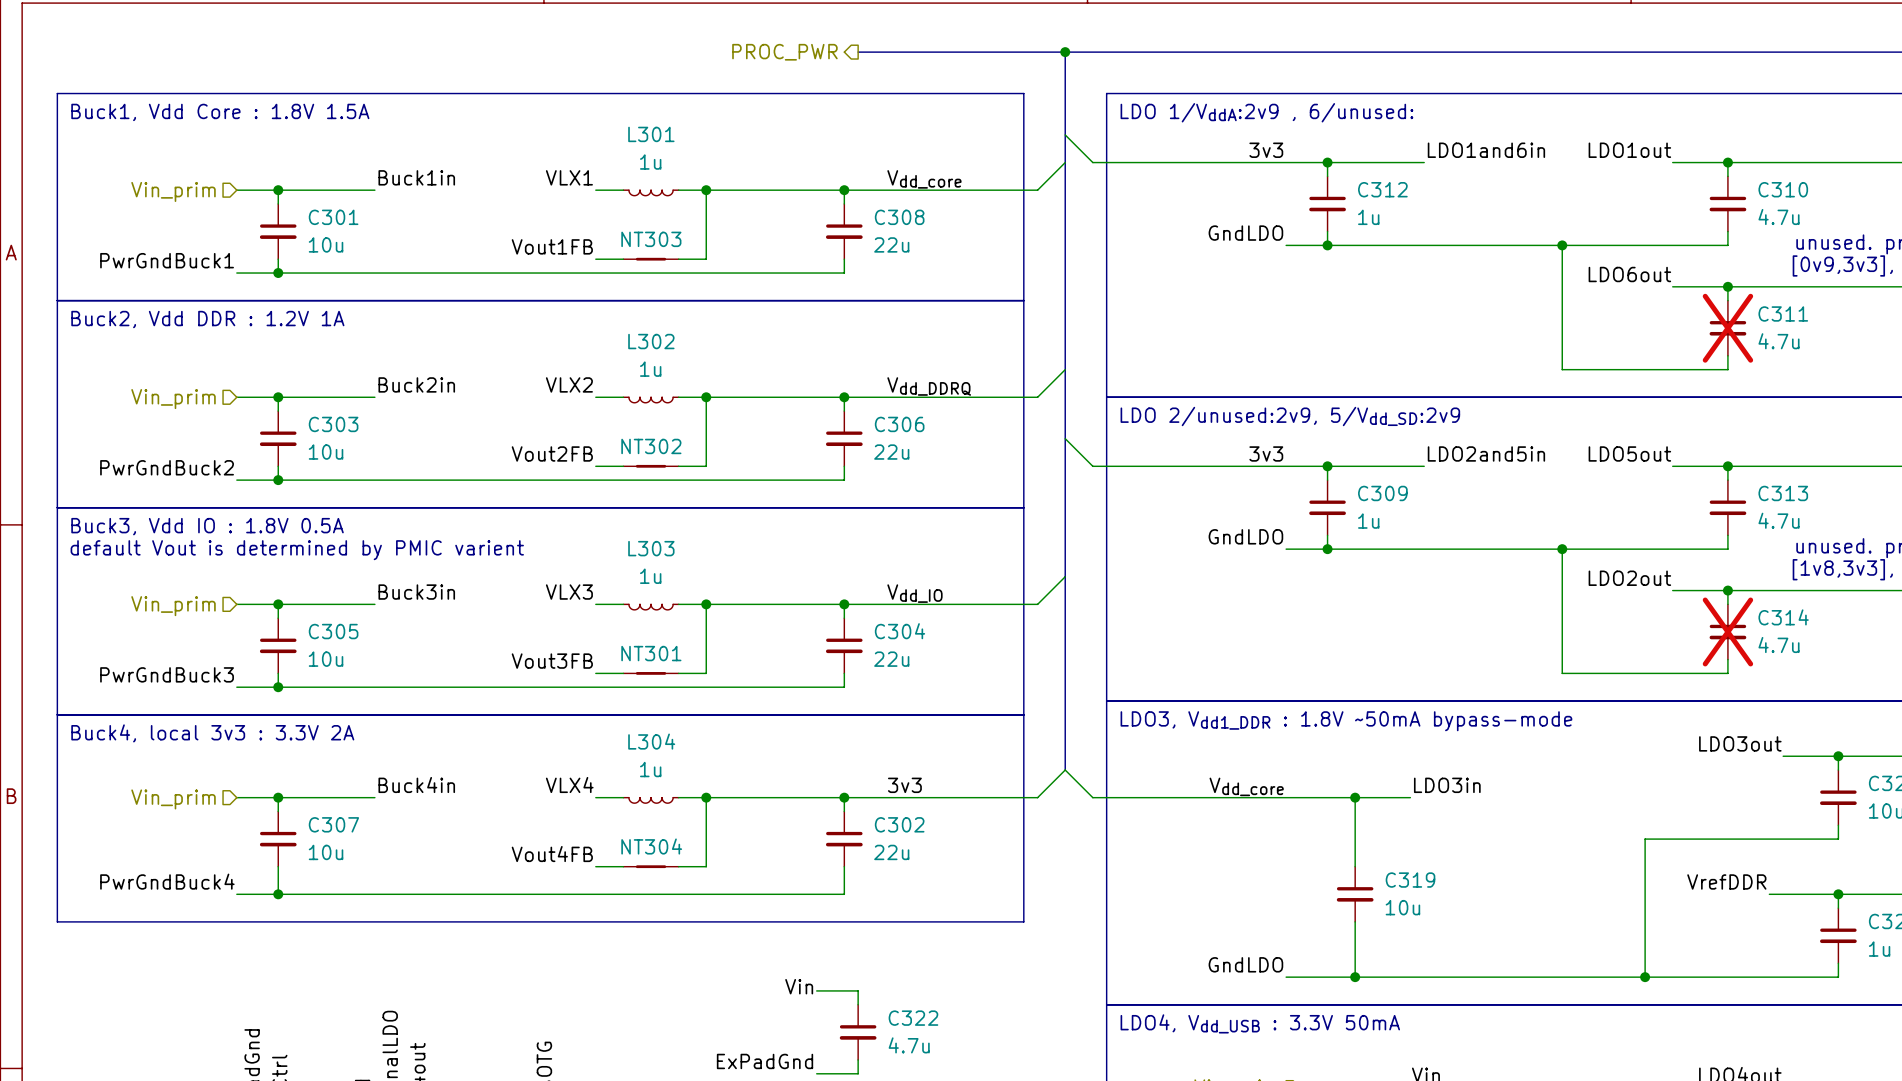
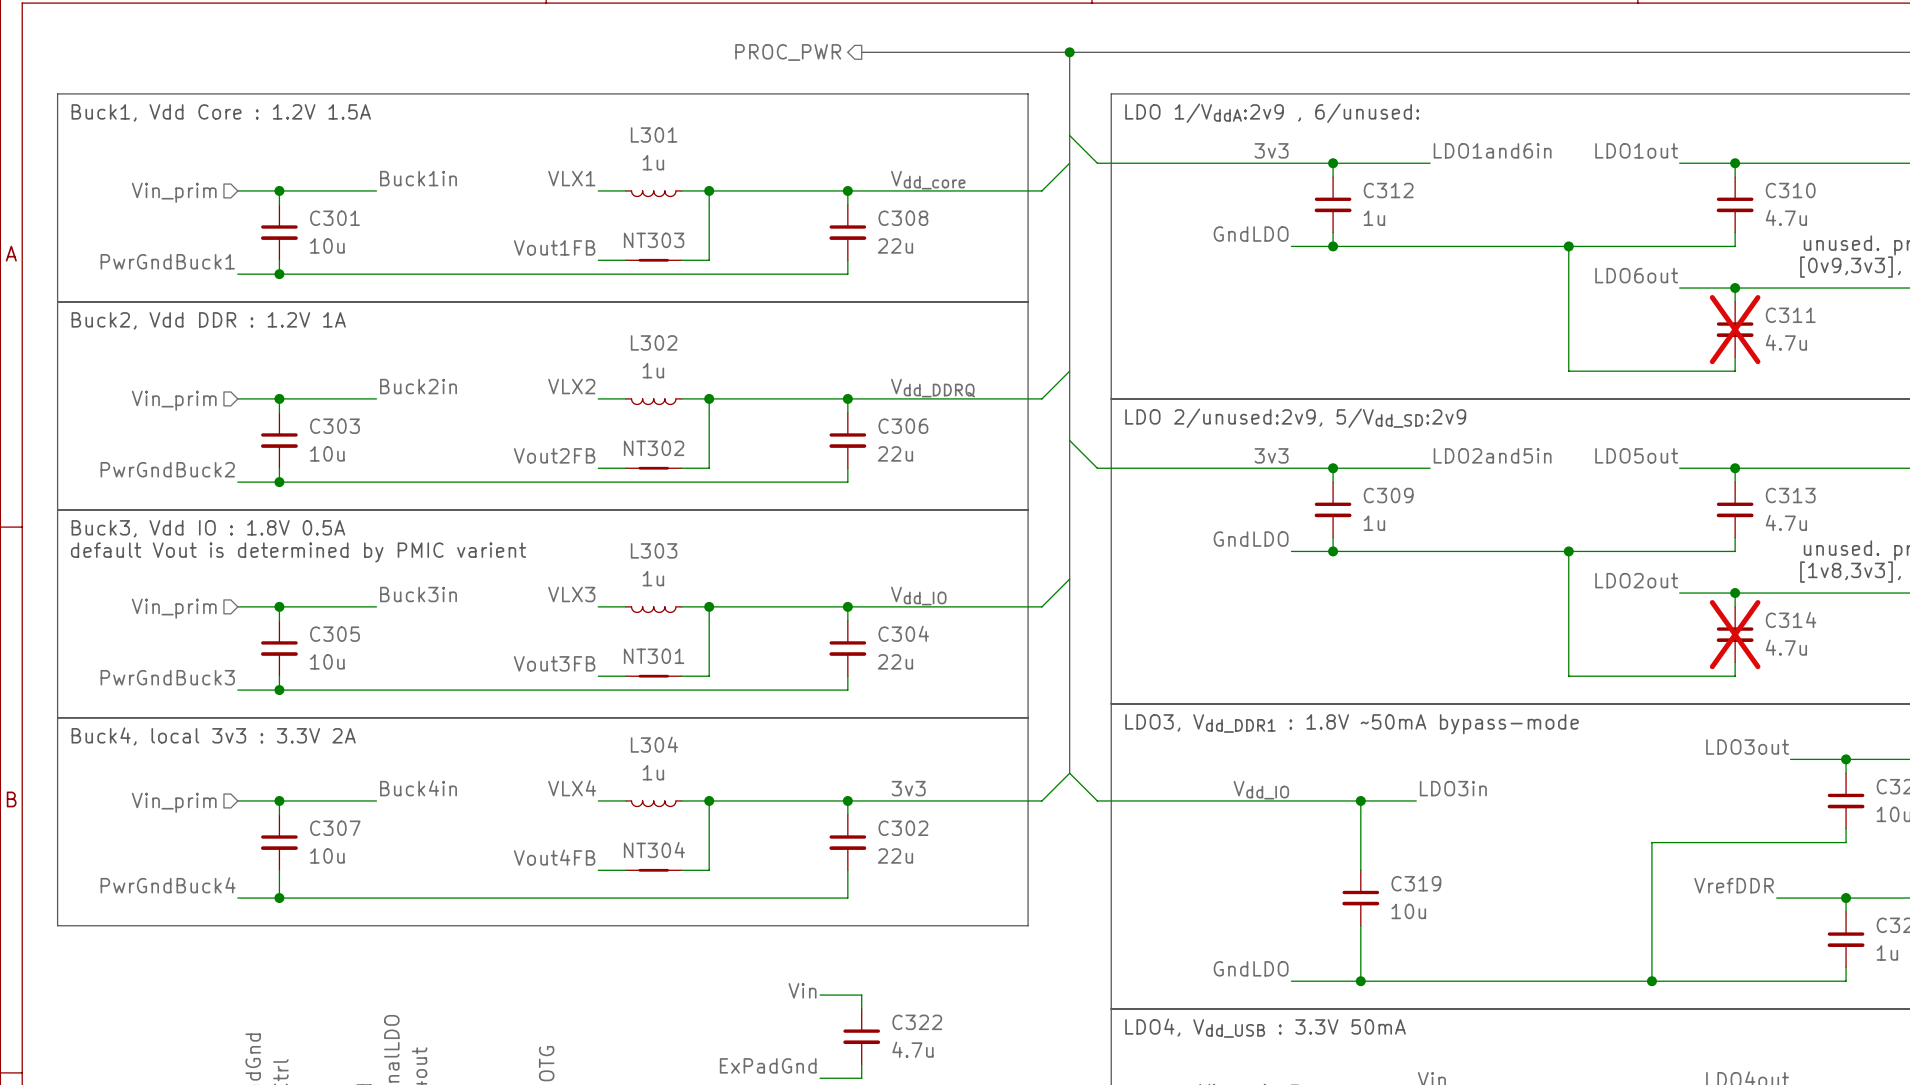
text: Buck1, Vdd Core : 1.8V 1.5A (220, 112) -> Buck1, Vdd Core : 1.2V 1.5A (221, 112)
text: LDO3, Vdd1_DDR : 1.8V ~50mA bypass-mode (1346, 721) -> LDO3, Vdd_DDR1 : 1.8V ~50mA bypass-mode (1352, 724)
label: Vdd_core (1246, 786) -> Vdd_IO (1261, 790)

